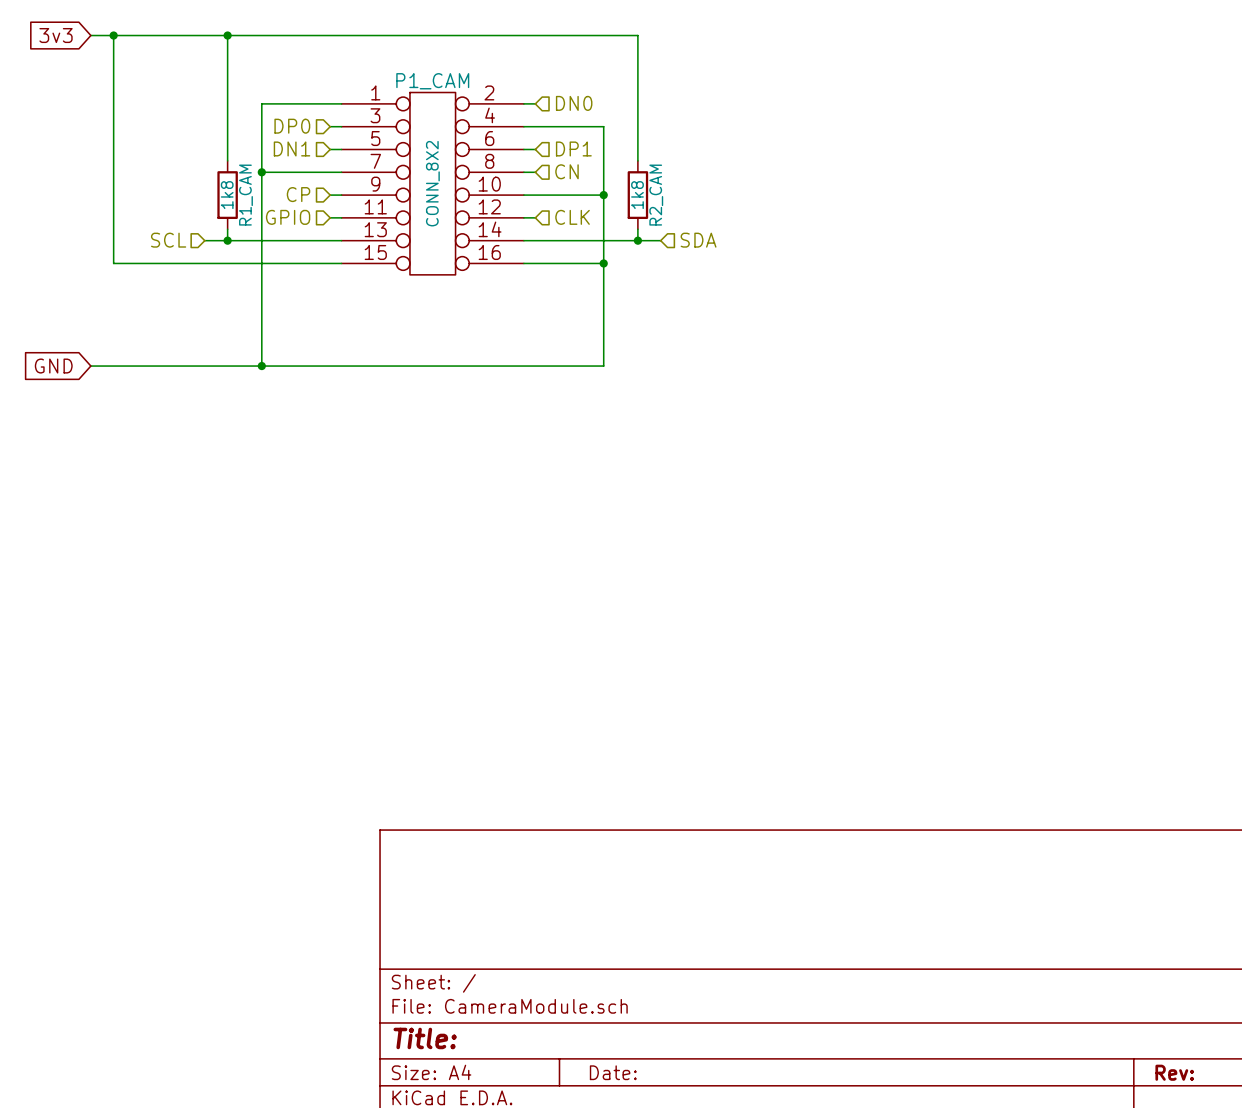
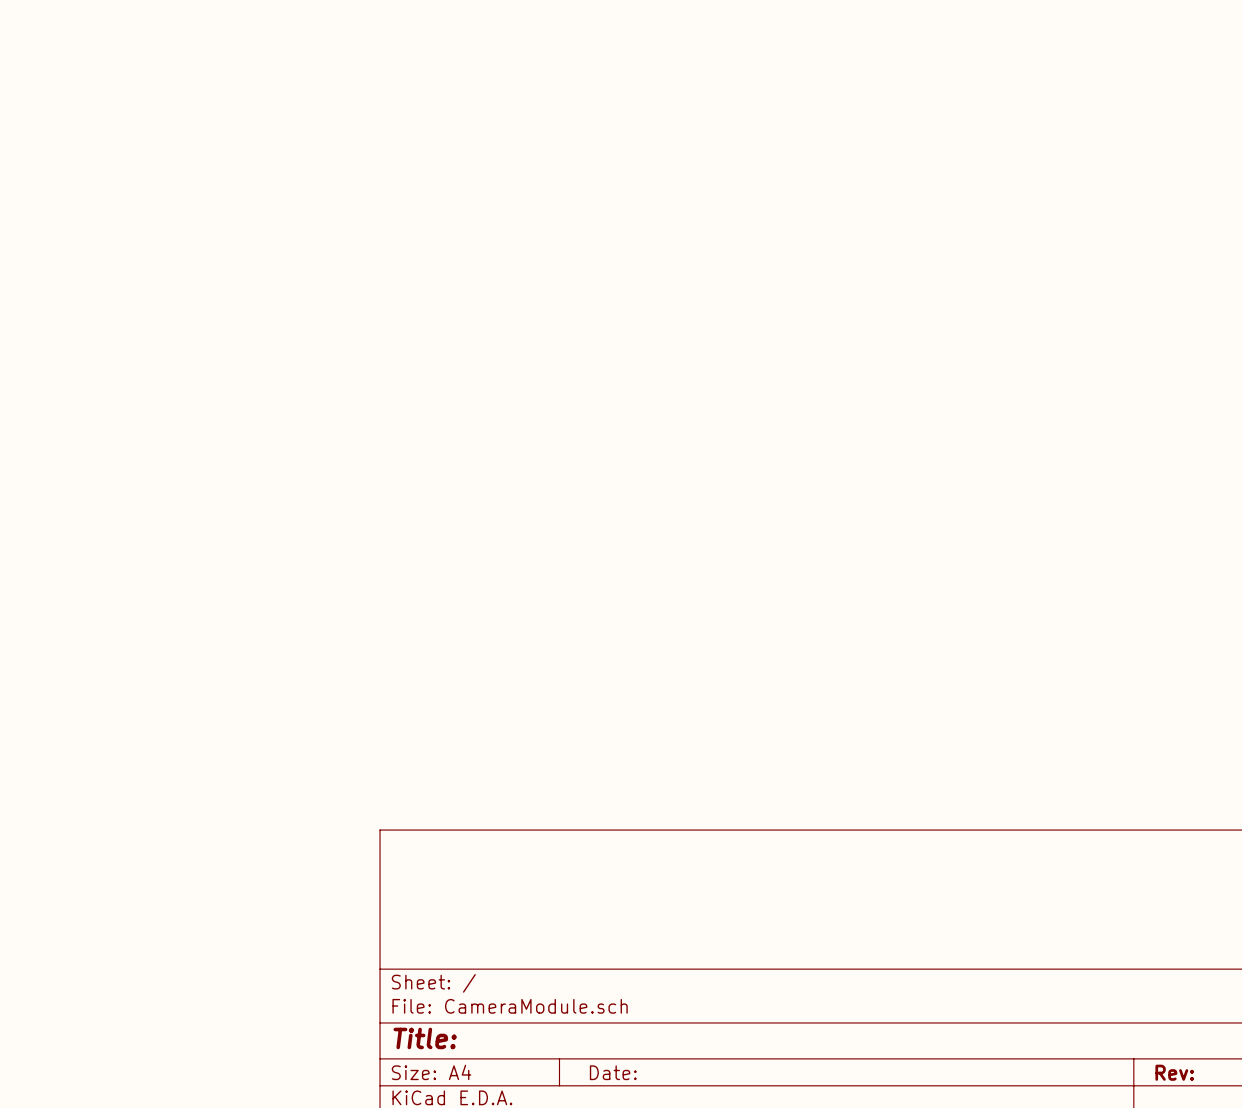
global label: 3v3 (56, 35) -> none
wire: (90, 35) (637, 35) (637, 160) -> none
wire: (113, 35) (113, 263) (341, 263) -> none
junction: (113, 35) -> none
wire: (227, 35) (227, 160) -> none
junction: (227, 35) -> none
wire: (341, 103) (261, 103) (261, 366) -> none
wire: (523, 103) (535, 103) -> none
hierarchical label: DN0 (574, 103) -> none
hierarchical label: DP0 (292, 126) -> none
wire: (330, 126) (341, 126) -> none
wire: (523, 126) (603, 126) (603, 366) (90, 366) -> none
hierarchical label: DN1 (292, 148) -> none
hierarchical label: DP1 (573, 148) -> none
wire: (330, 149) (341, 149) -> none
wire: (523, 149) (535, 149) -> none
hierarchical label: CN (567, 171) -> none
wire: (261, 172) (341, 172) -> none
junction: (261, 172) -> none
wire: (523, 172) (535, 172) -> none
P1_CAM: CONN_8X2 (432, 183) -> none
hierarchical label: CP (298, 194) -> none
R1_CAM: 1k8 (227, 195) -> none
wire: (330, 195) (341, 195) -> none
wire: (523, 195) (603, 195) -> none
junction: (603, 195) -> none
R2_CAM: 1k8 (637, 195) -> none
hierarchical label: GPIO (288, 217) -> none
wire: (330, 217) (341, 217) -> none
wire: (523, 217) (535, 217) -> none
hierarchical label: CLK (572, 217) -> none
wire: (227, 229) (227, 240) -> none
wire: (637, 229) (637, 240) -> none
hierarchical label: SCL (168, 240) -> none
wire: (204, 240) (341, 240) -> none
junction: (227, 240) -> none
wire: (523, 240) (660, 240) -> none
junction: (637, 240) -> none
hierarchical label: SDA (698, 240) -> none
wire: (523, 263) (603, 263) -> none
junction: (603, 263) -> none
global label: GND (53, 366) -> none
junction: (261, 366) -> none

